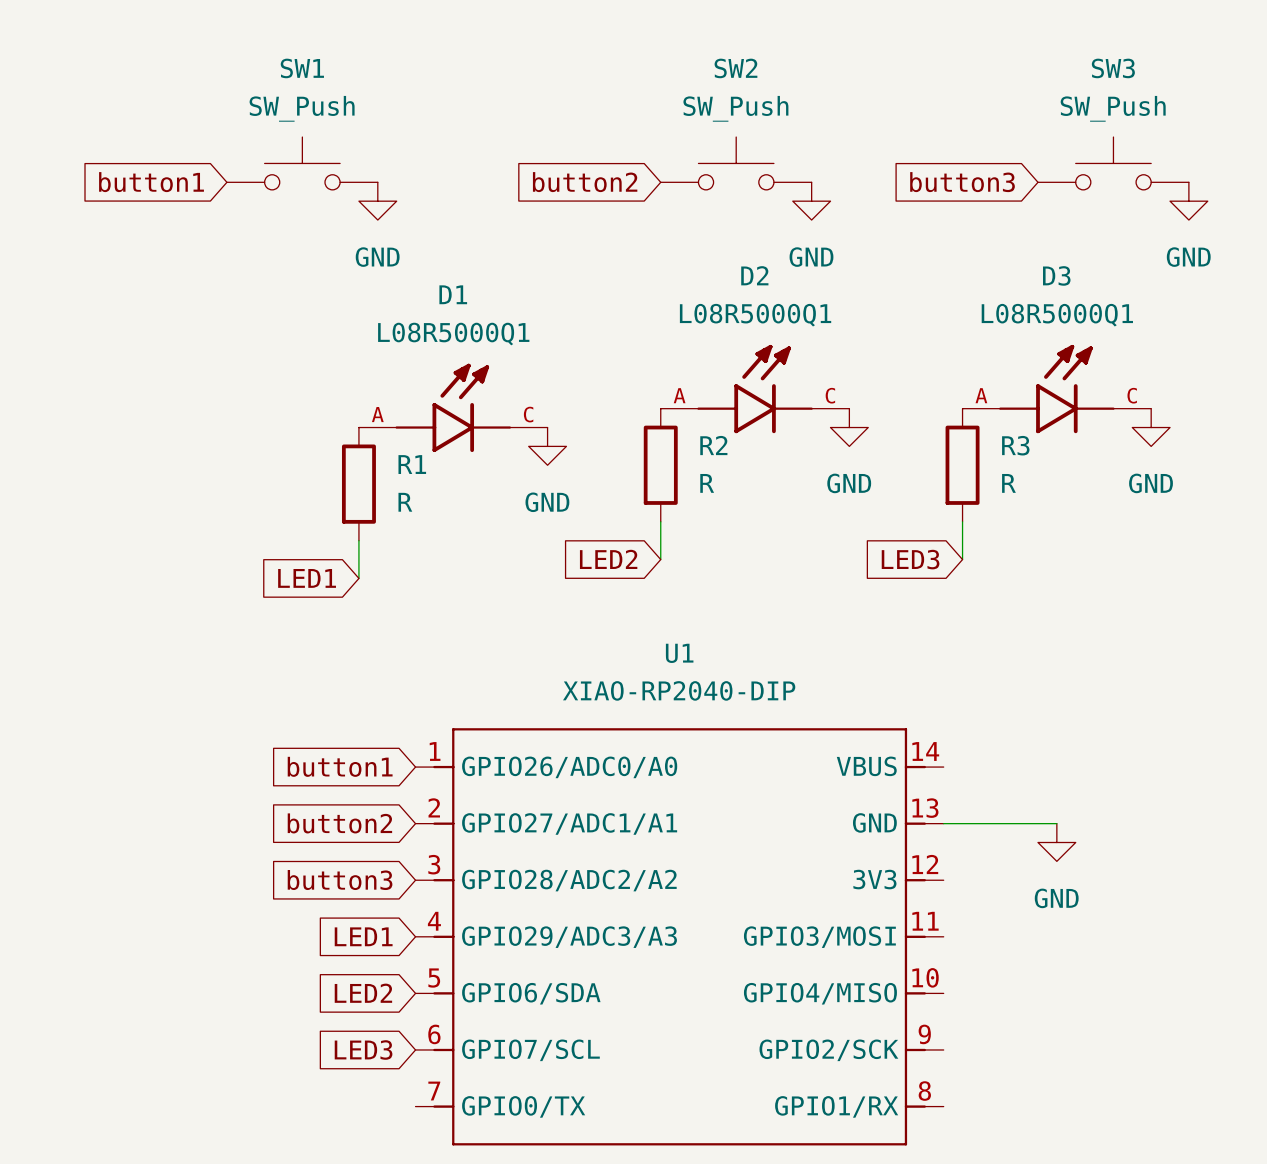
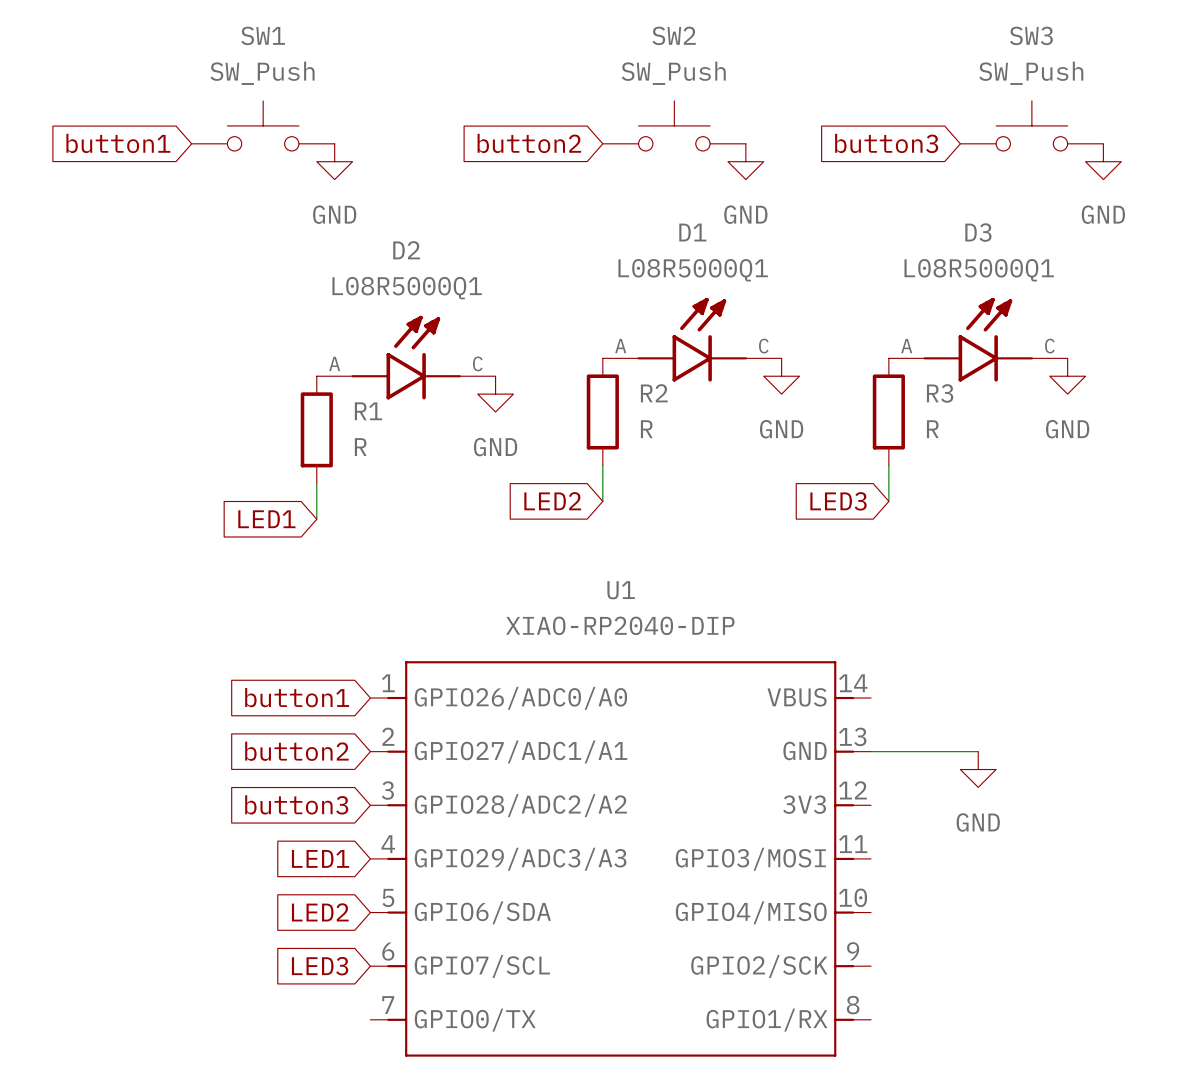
D2 name: D2 (754, 275) -> D1 (692, 232)
D1 name: D1 (453, 294) -> D2 (406, 250)

